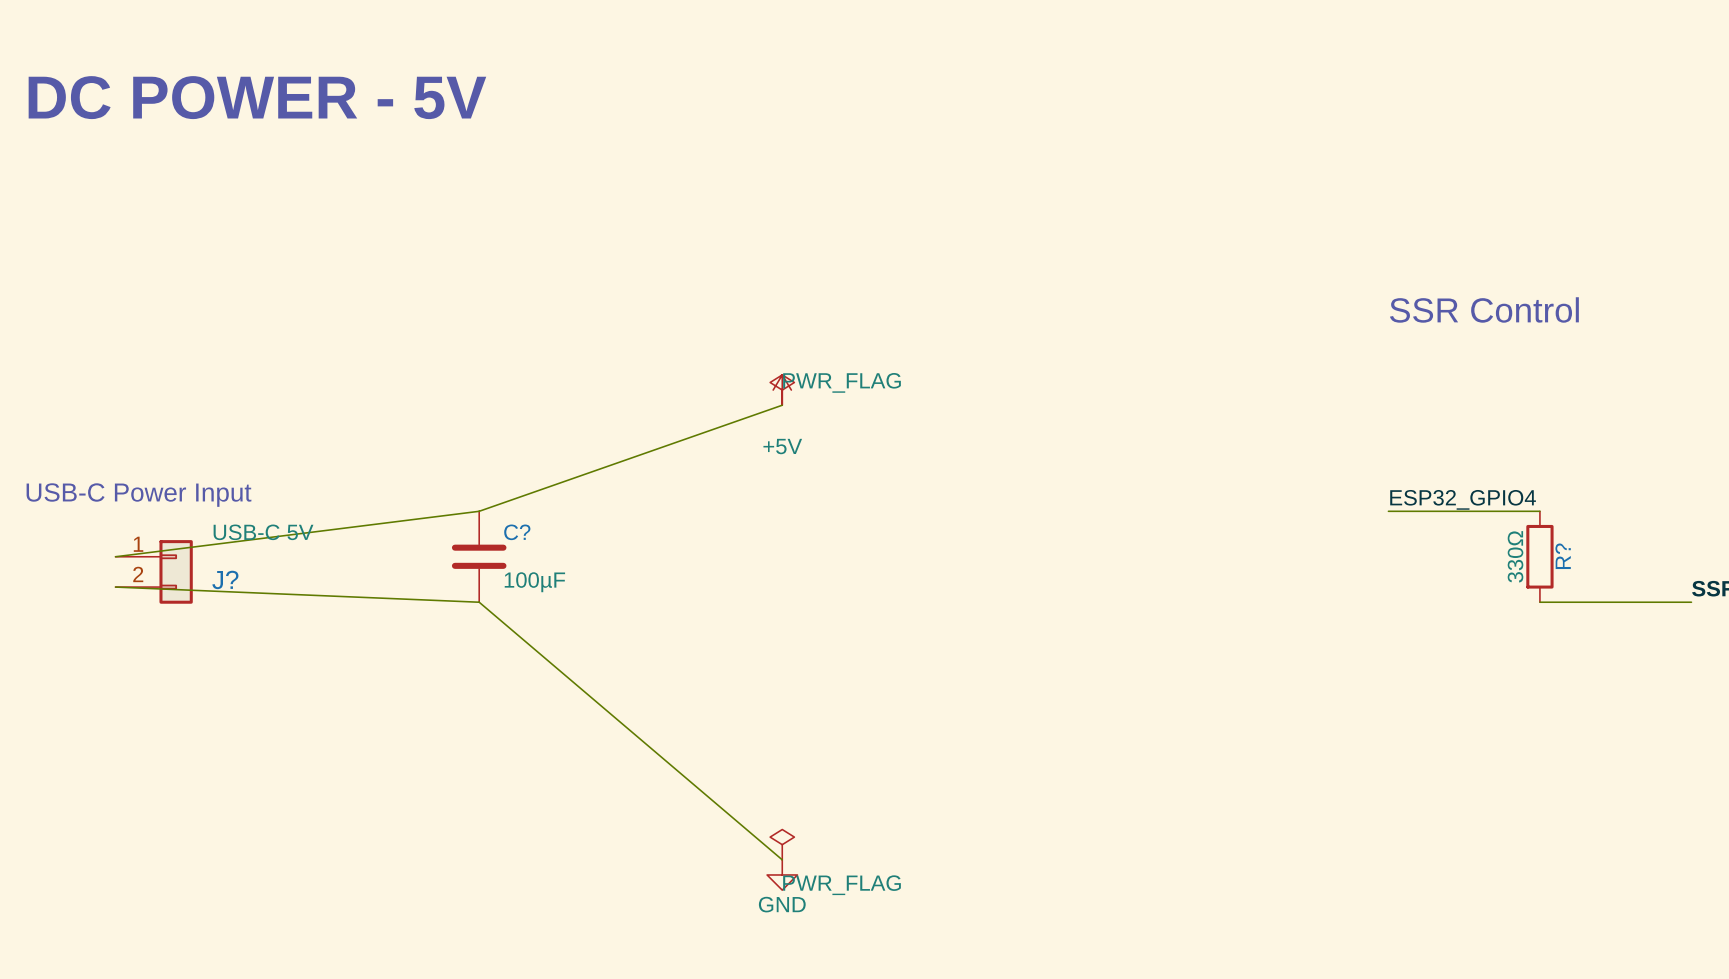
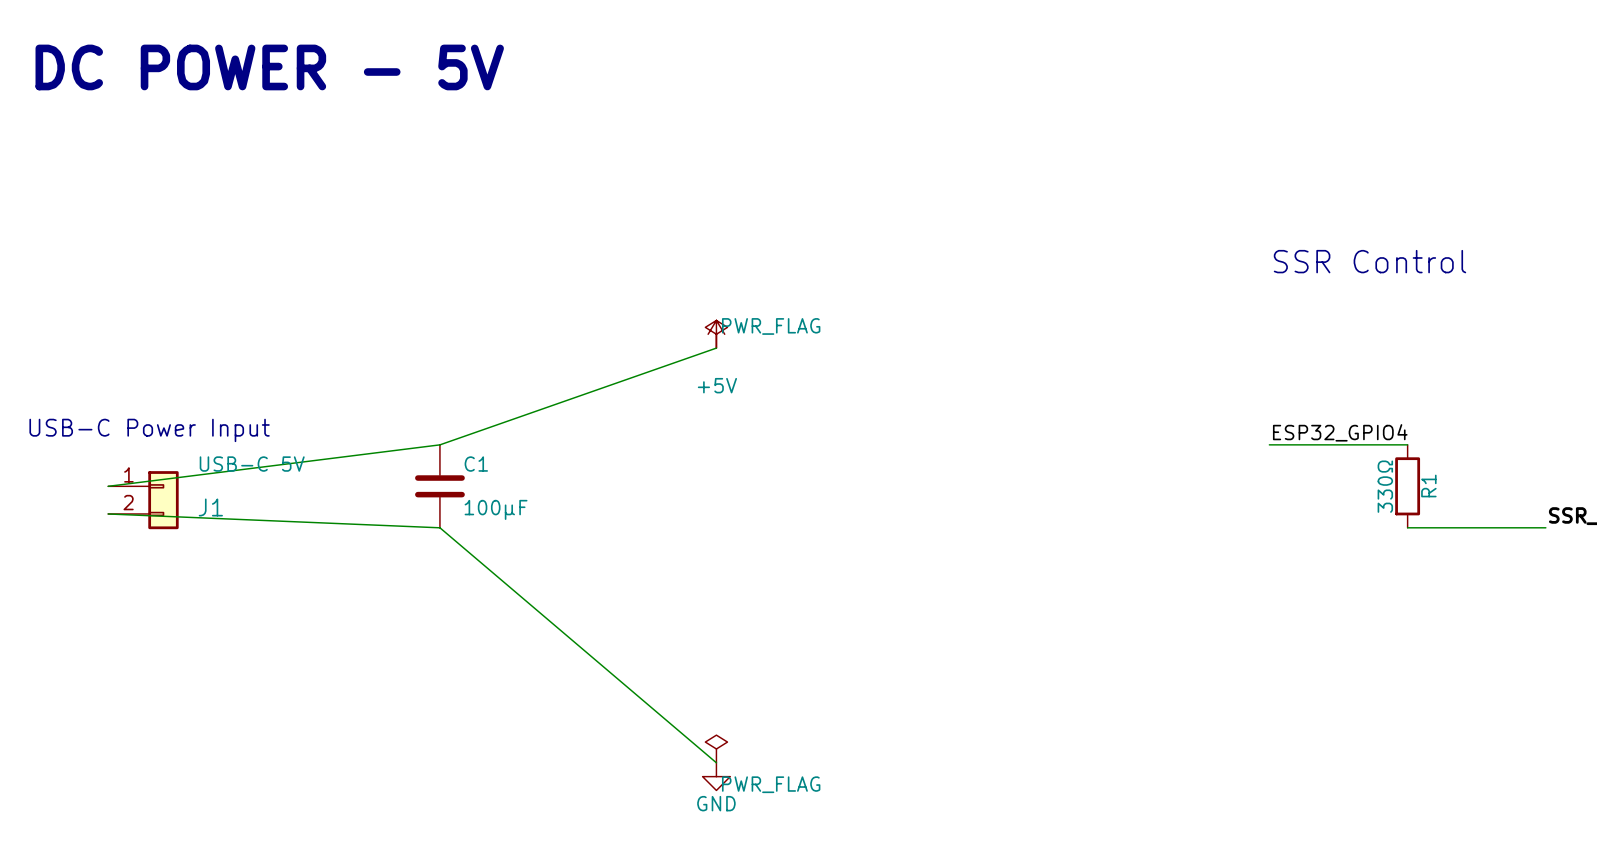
C? name: C? (517, 532) -> C1 (476, 464)
R? name: R? (1563, 556) -> R1 (1428, 486)
J? name: J? (225, 579) -> J1 (210, 507)

